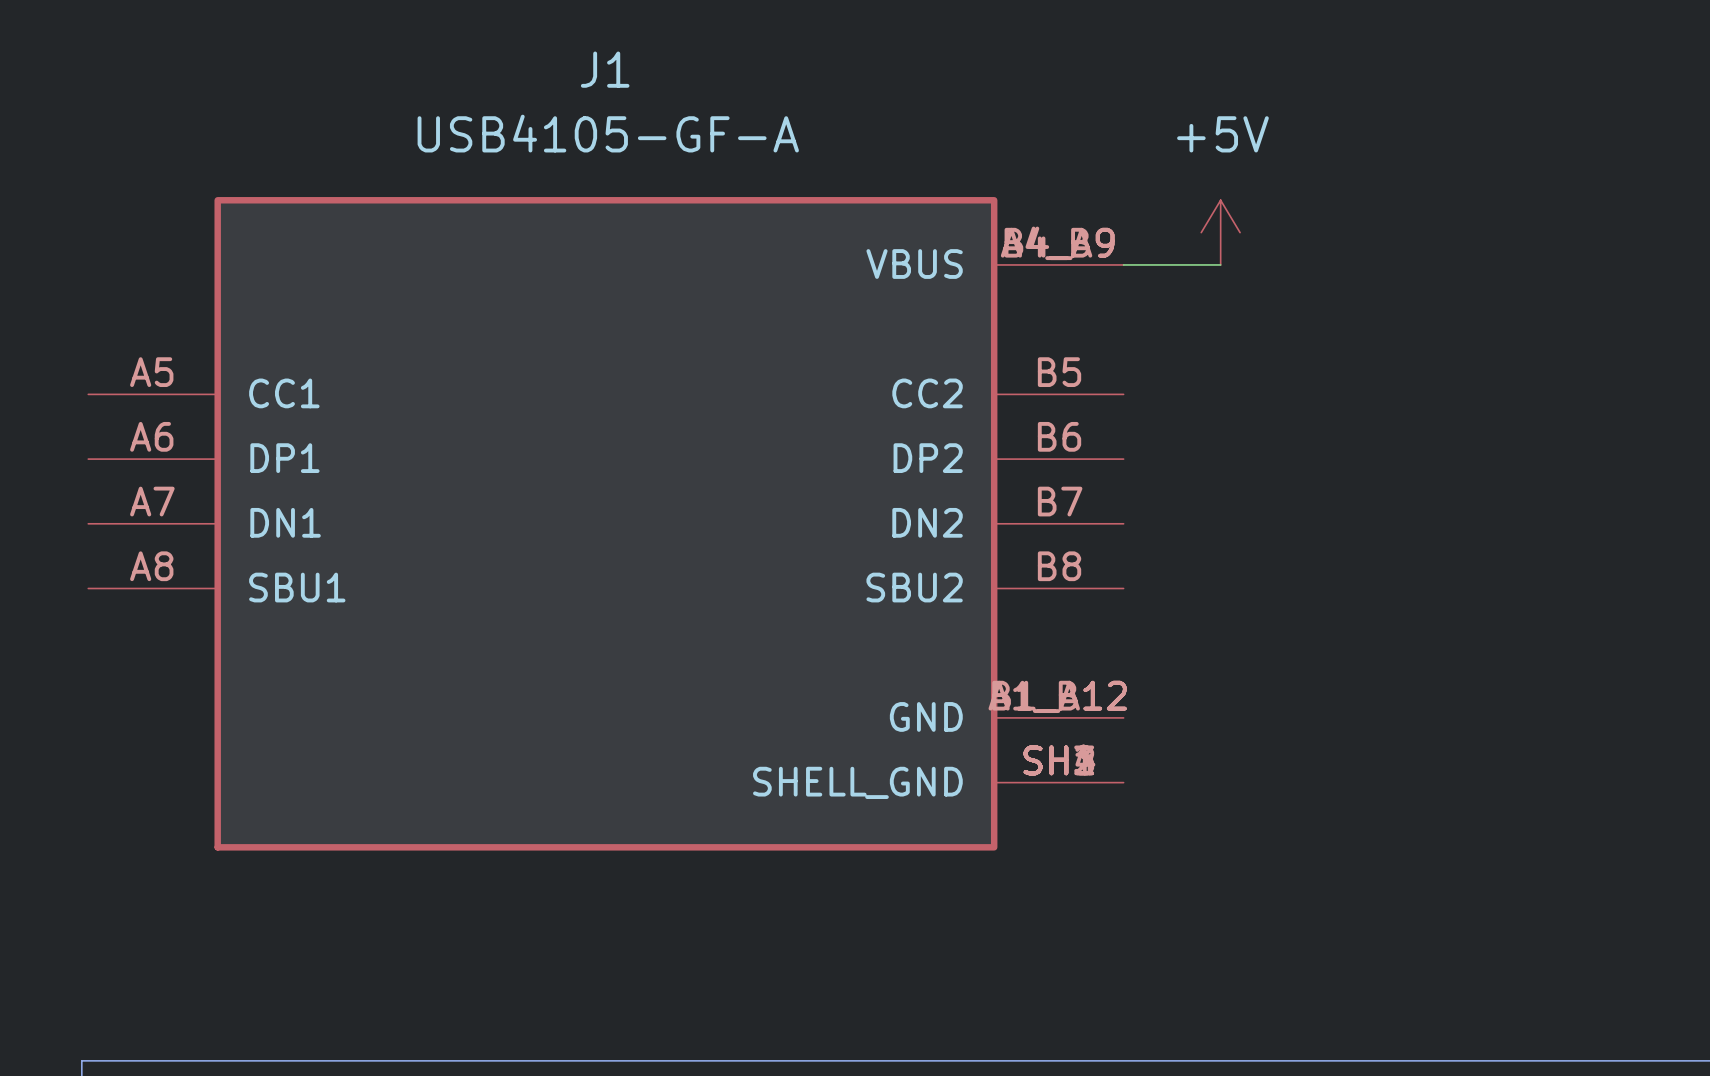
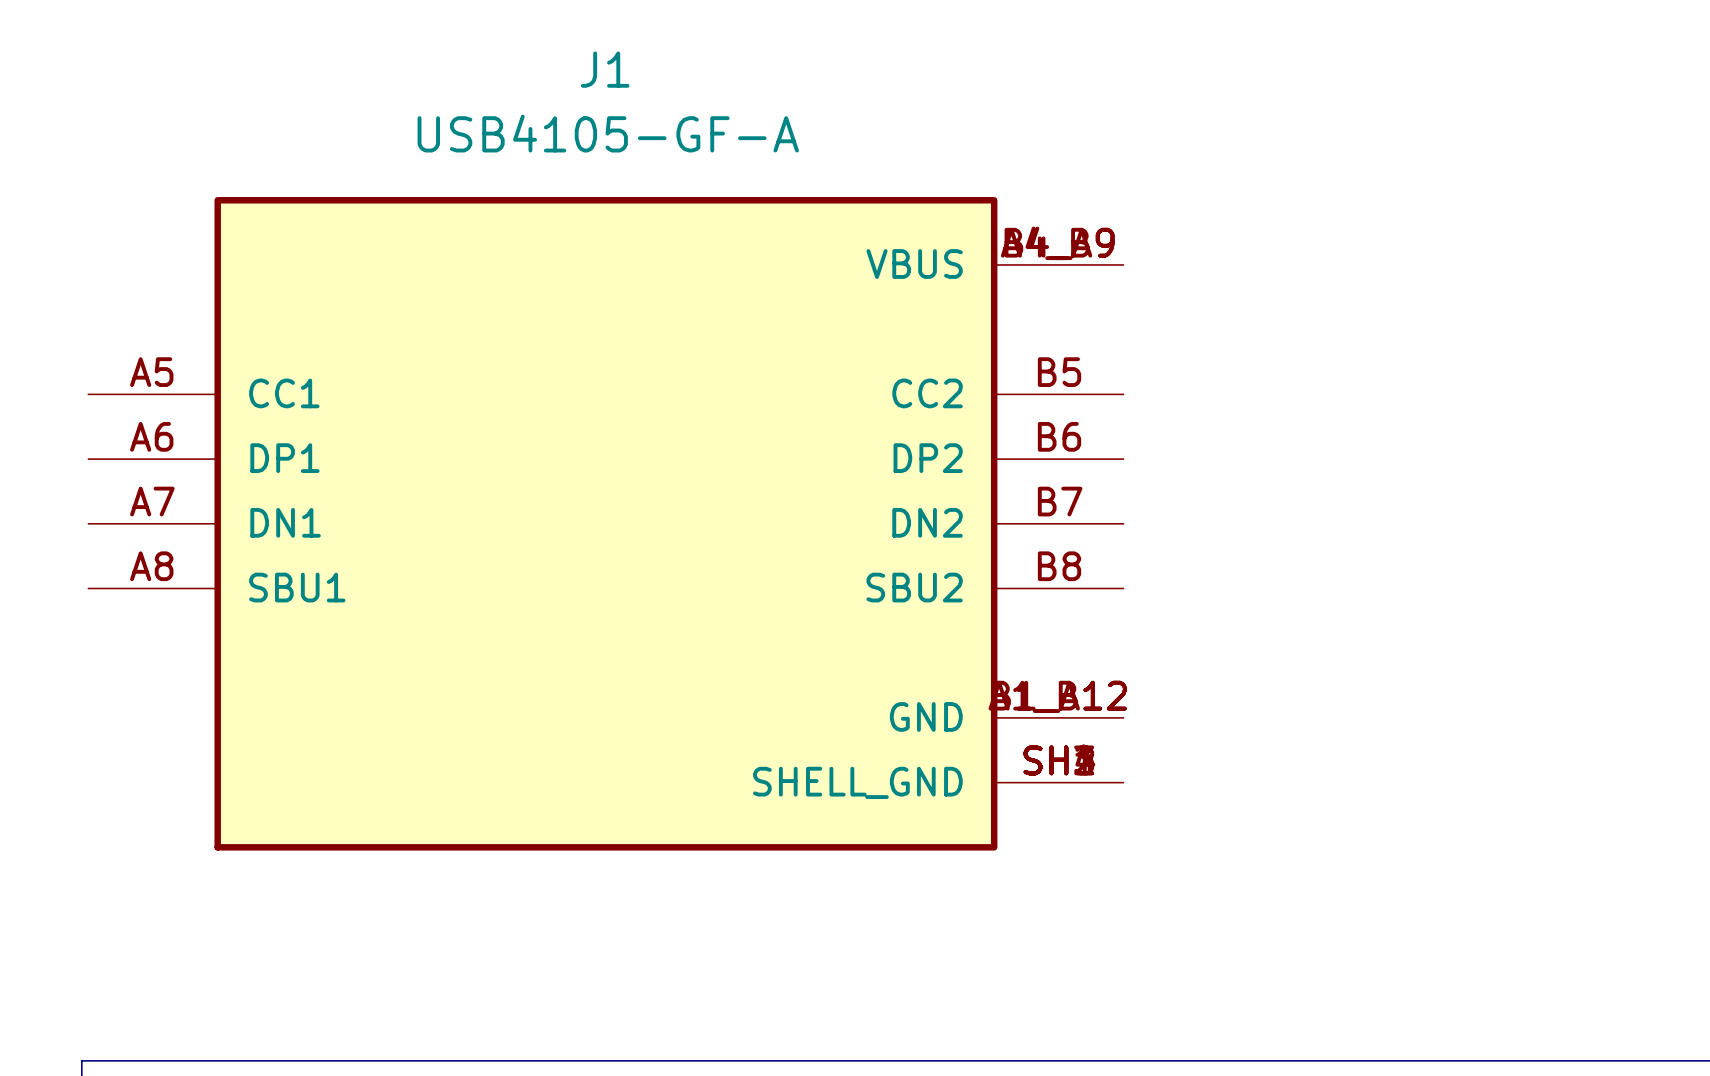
power symbol: +5V (1220, 232) -> none
wire: (1123, 264) (1220, 264) -> none

